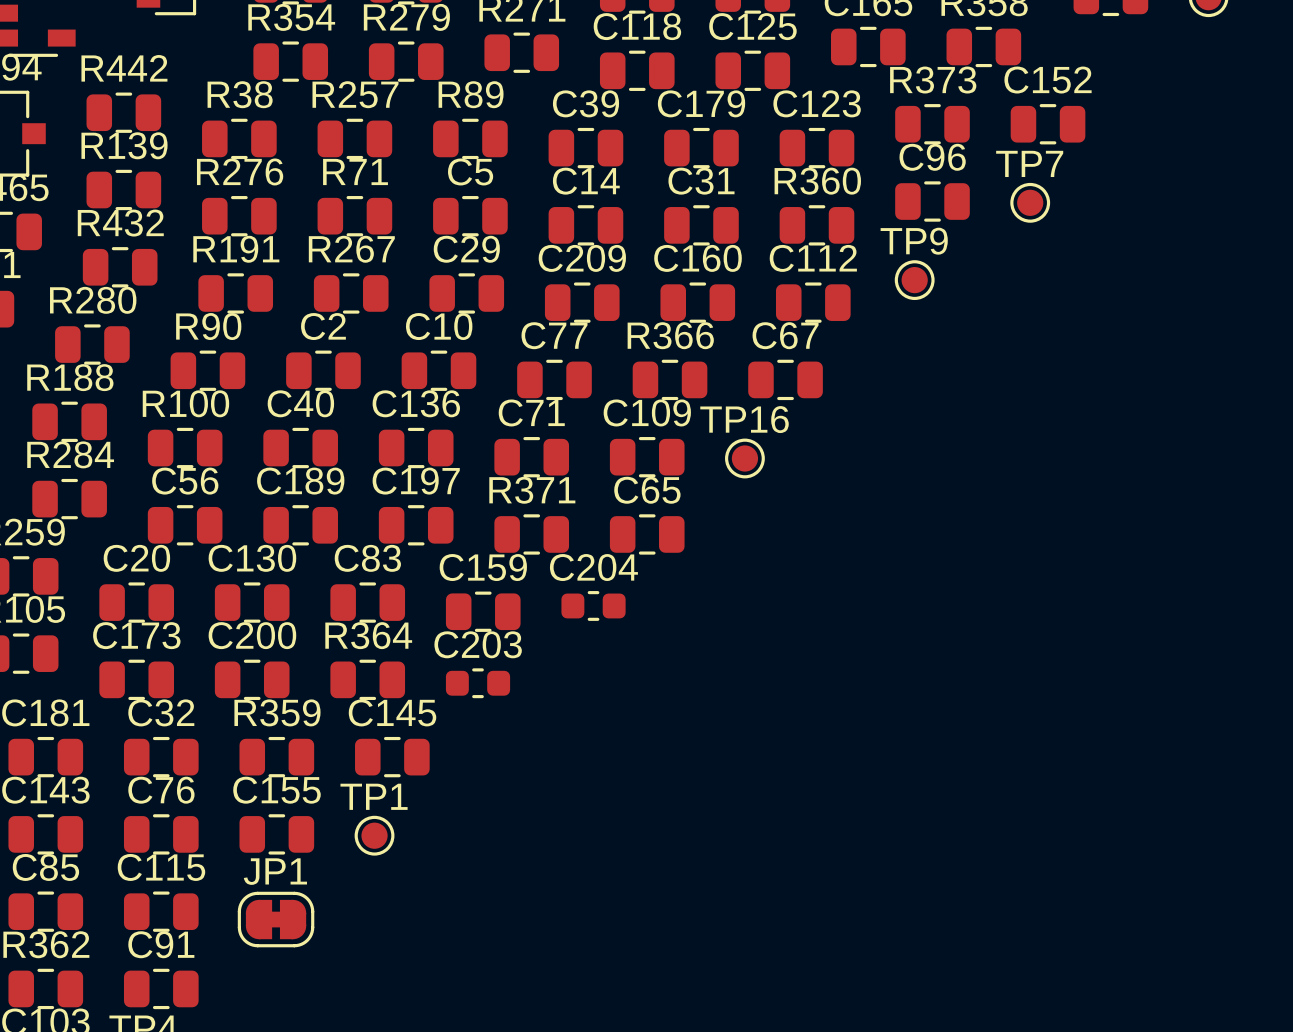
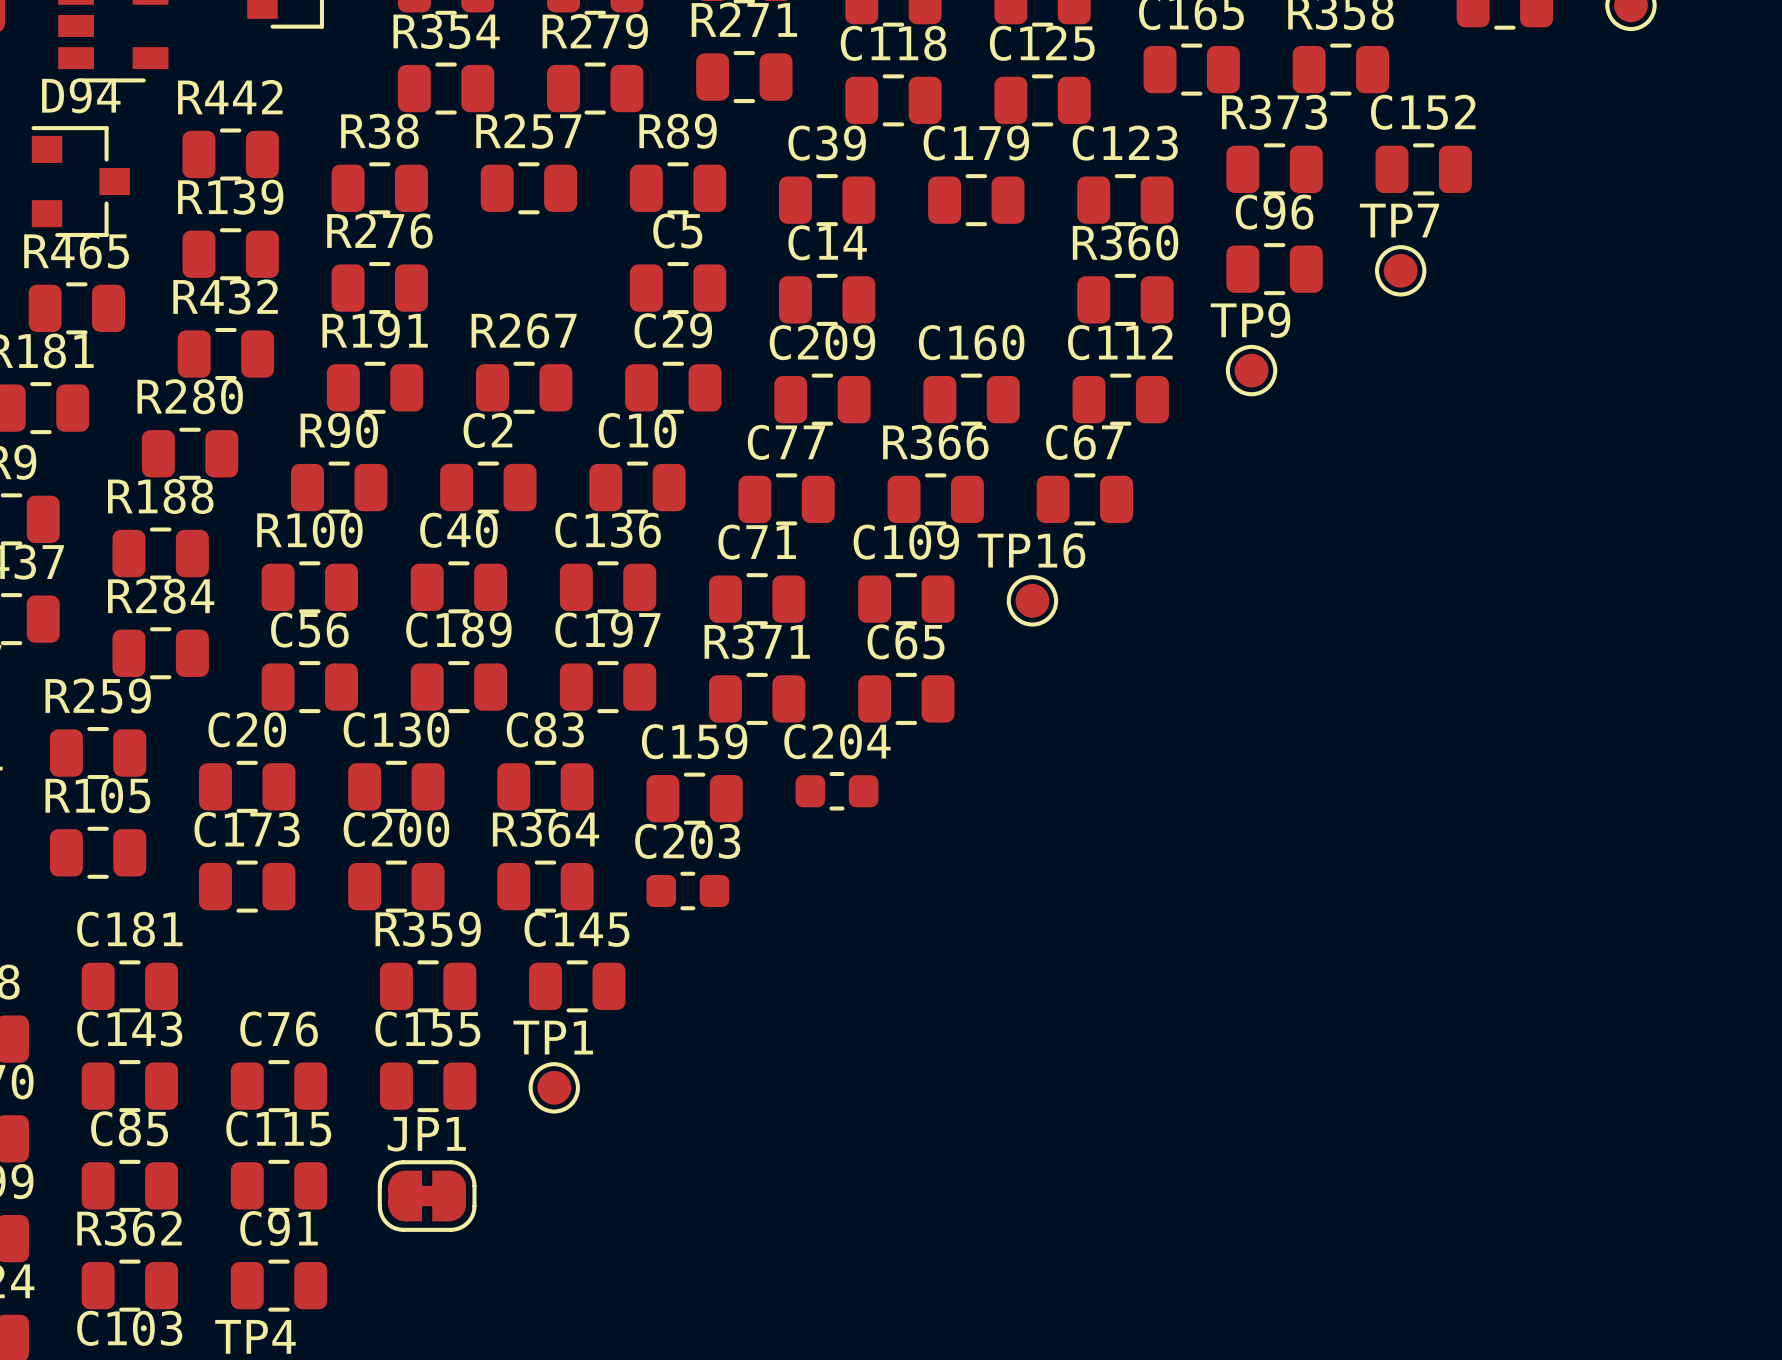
R71: (354, 216) -> none
C31: (701, 225) -> none
C32: (161, 757) -> none

